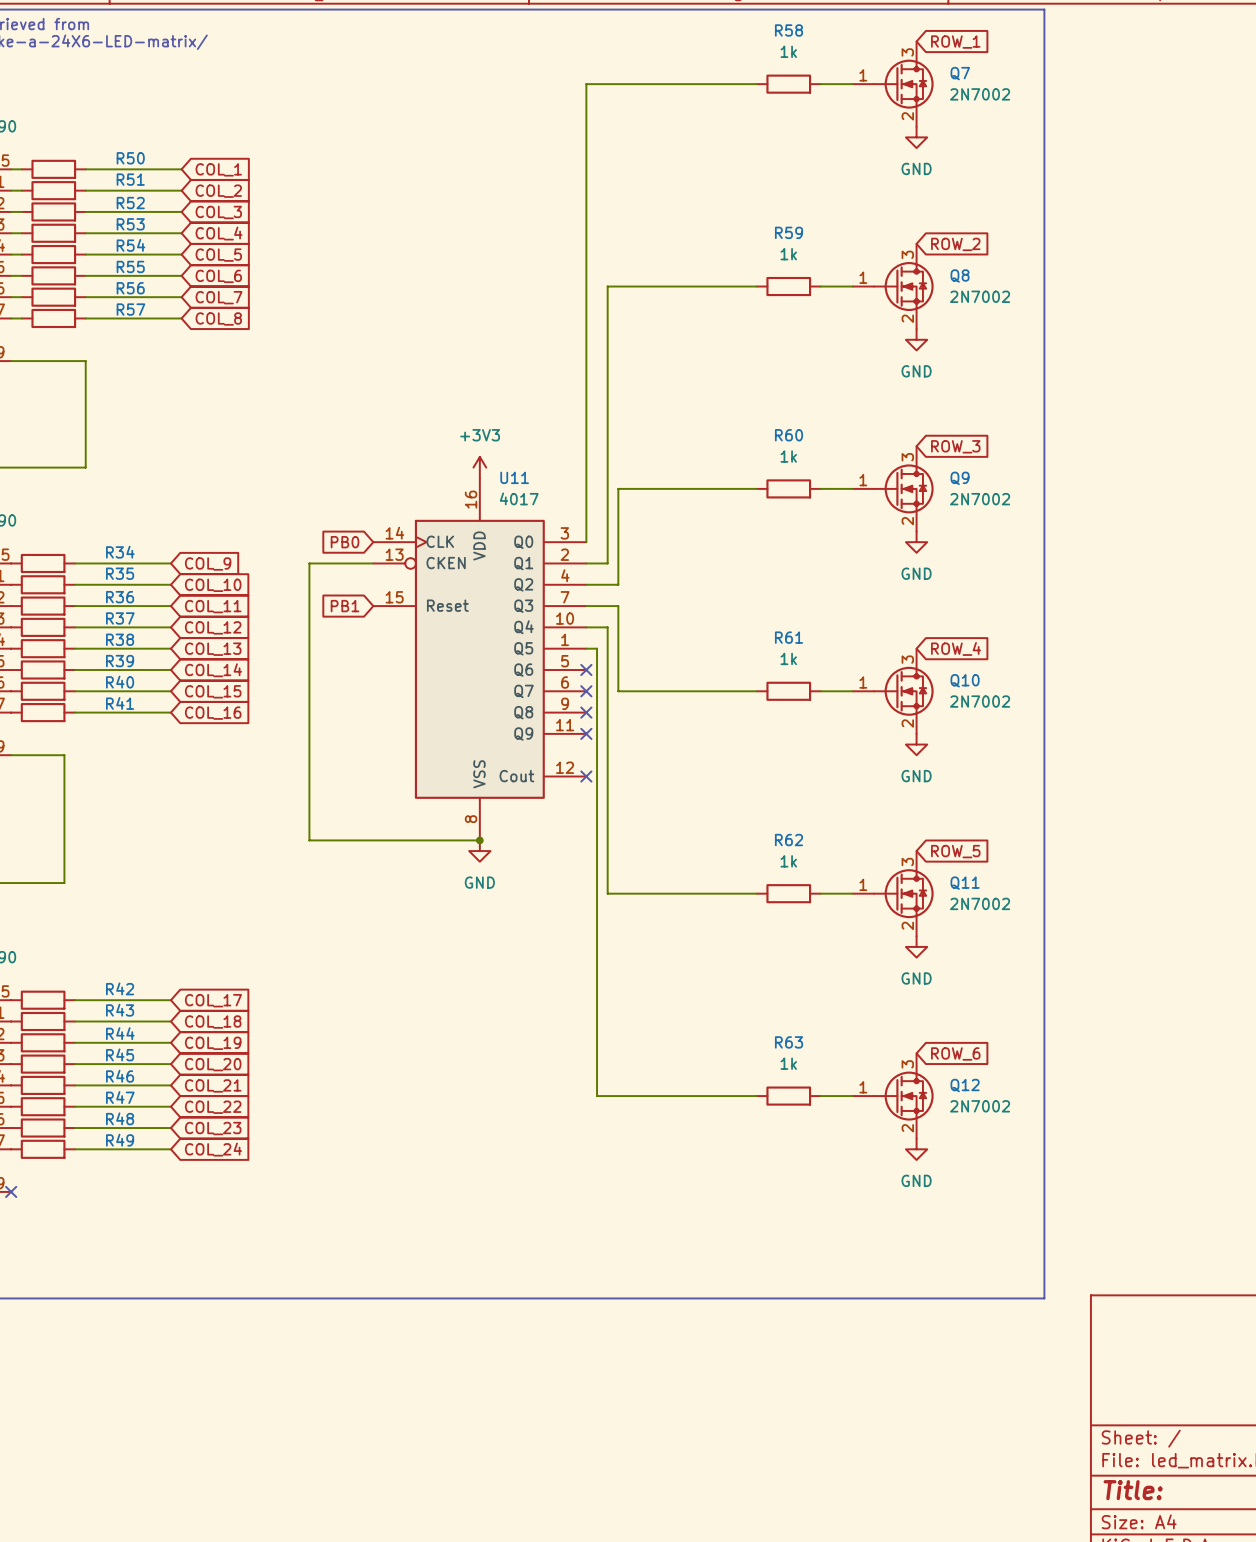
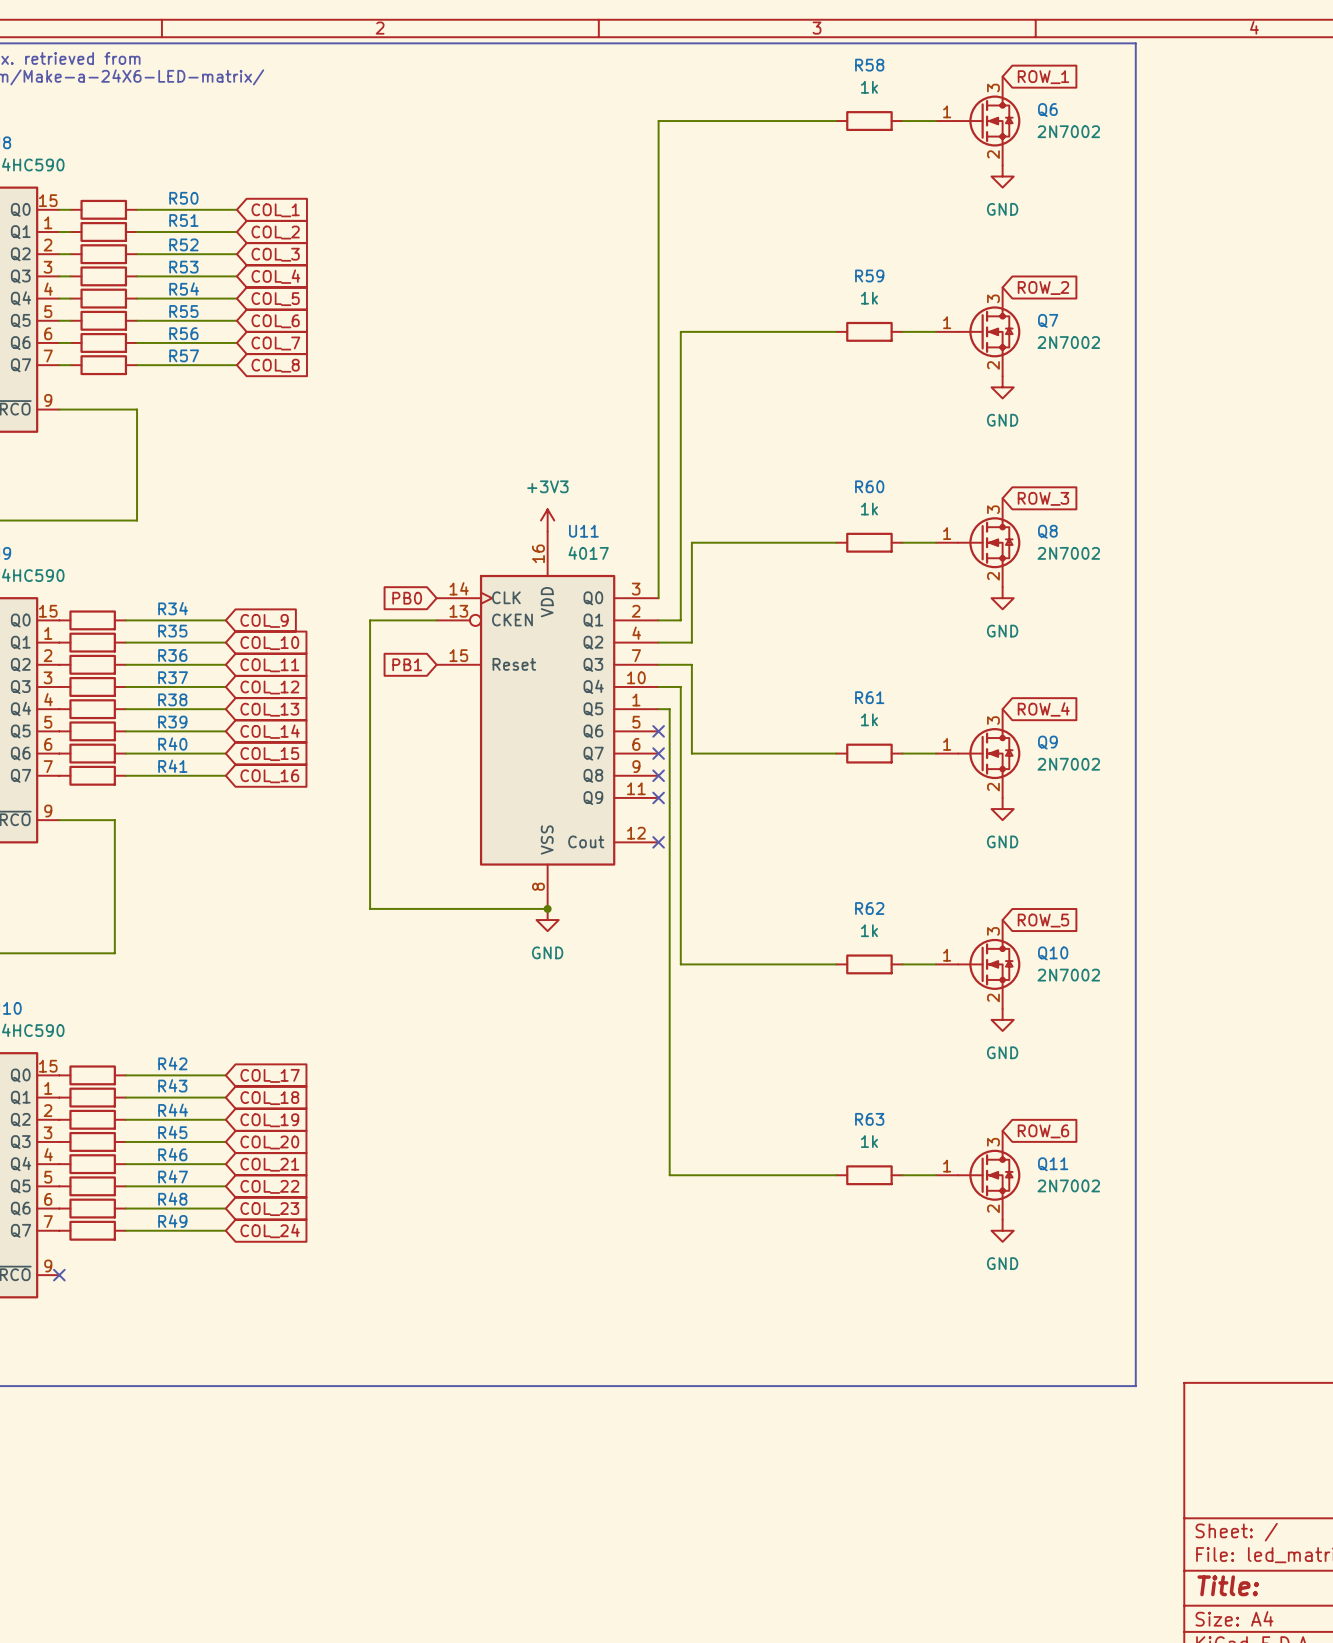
Q7 name: Q7 (960, 73) -> Q6 (1047, 110)
Q8 name: Q8 (960, 275) -> Q7 (1048, 320)
Q9 name: Q9 (960, 478) -> Q8 (1047, 531)
Q10 name: Q10 (965, 680) -> Q9 (1047, 742)
Q11 name: Q11 (965, 883) -> Q10 (1053, 953)
Q12 name: Q12 (965, 1085) -> Q11 (1053, 1164)

